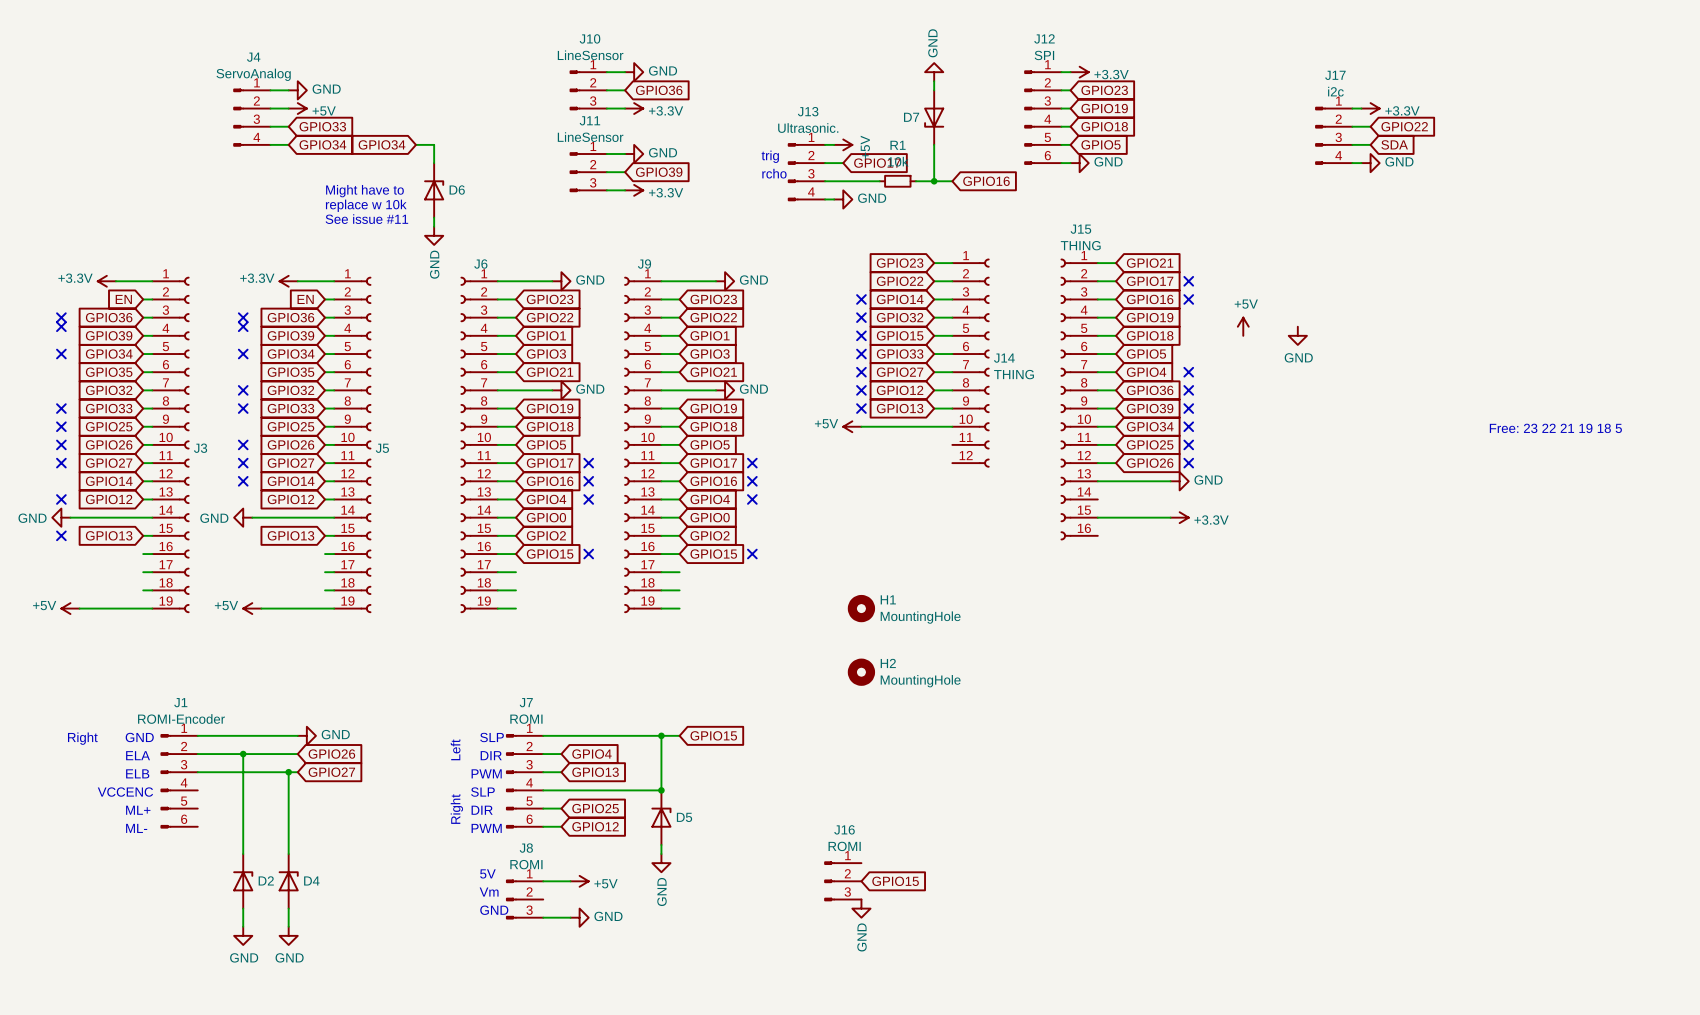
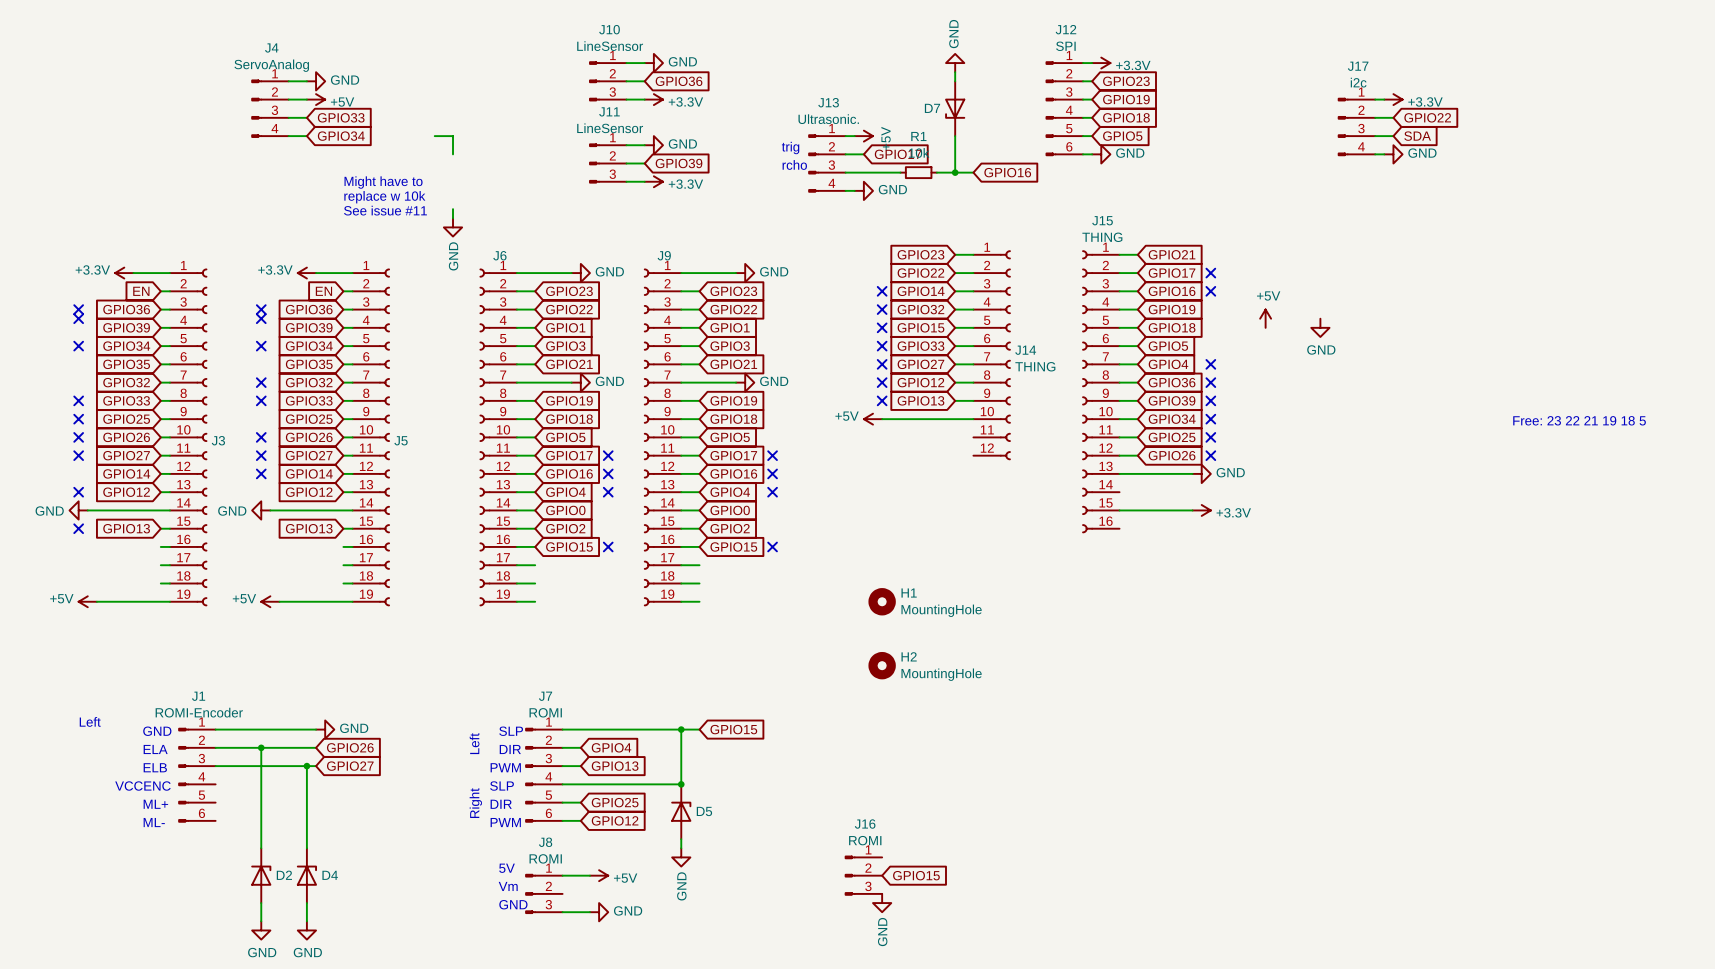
global label: GPIO34 (381, 144) -> none
D6: (434, 190) -> none
text: none -> Left (90, 721)
text: Right (82, 738) -> none

